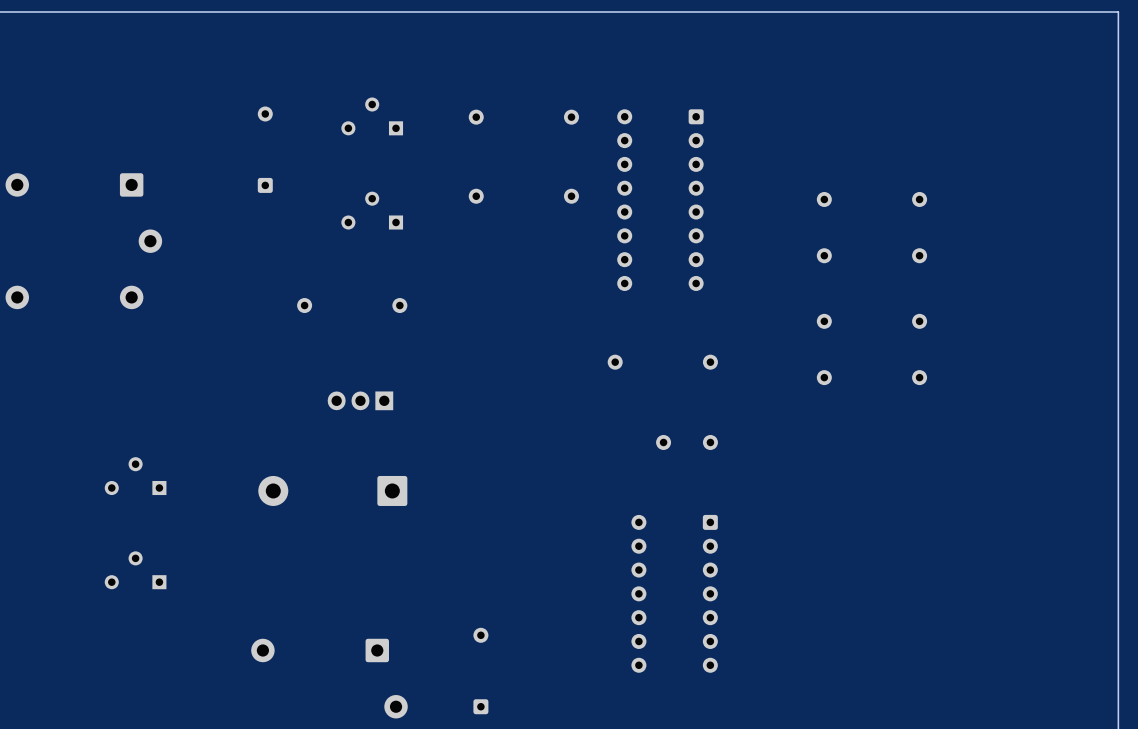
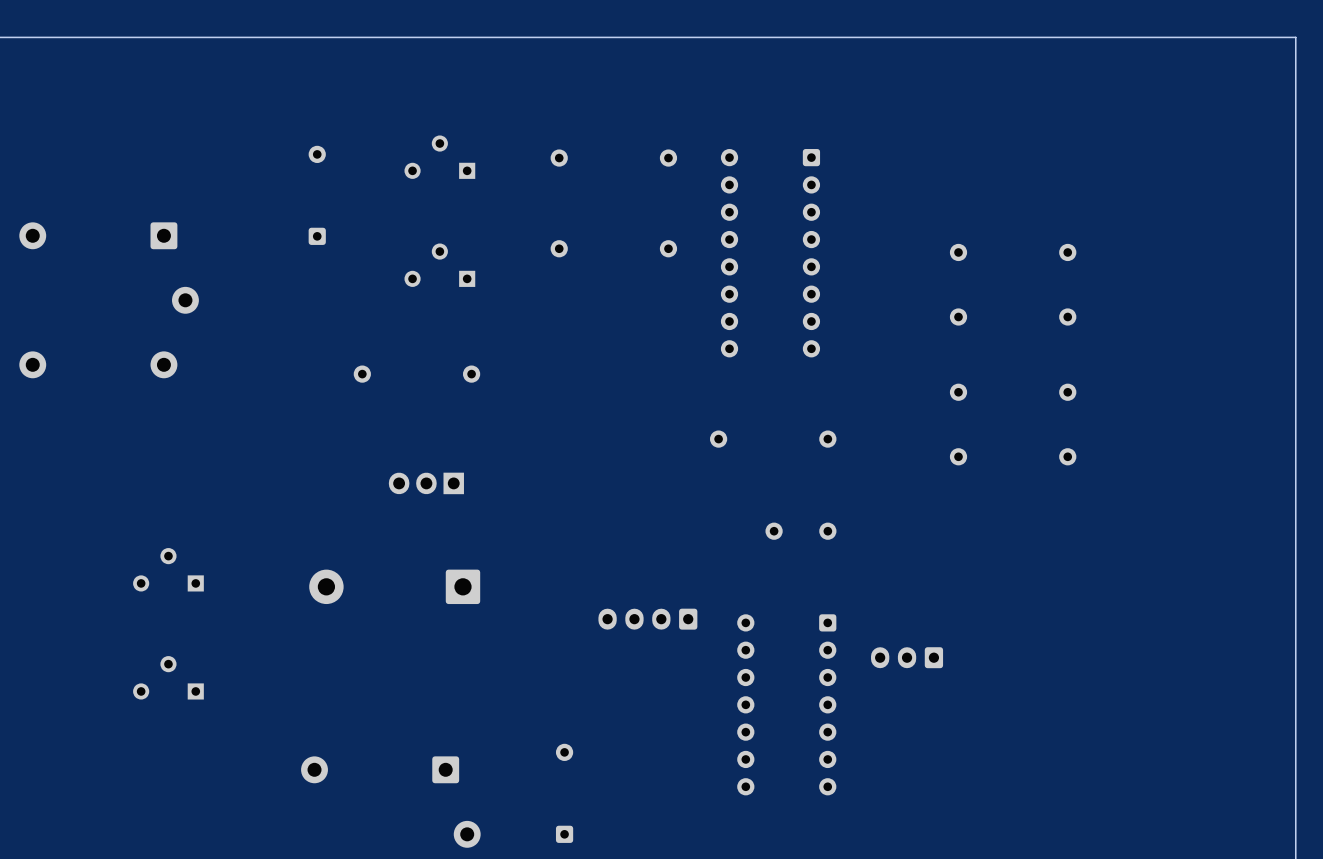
part: none -> (647, 619)
part: none -> (907, 657)

